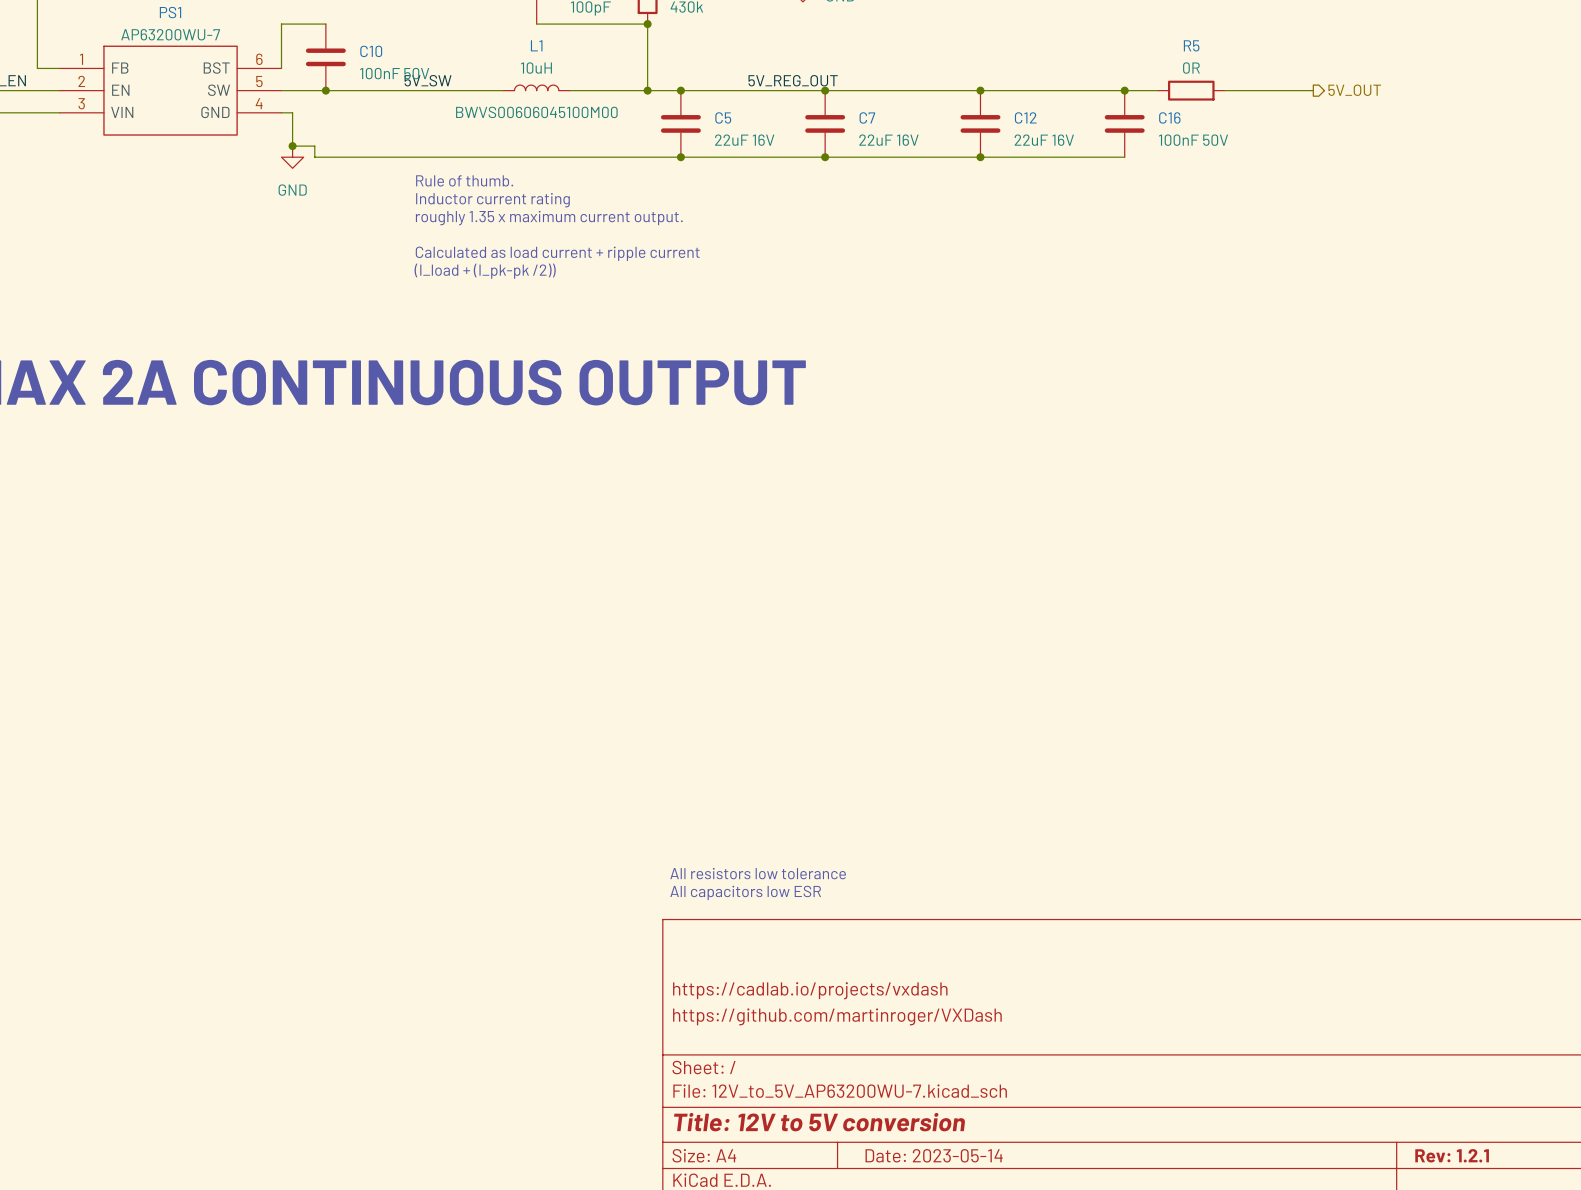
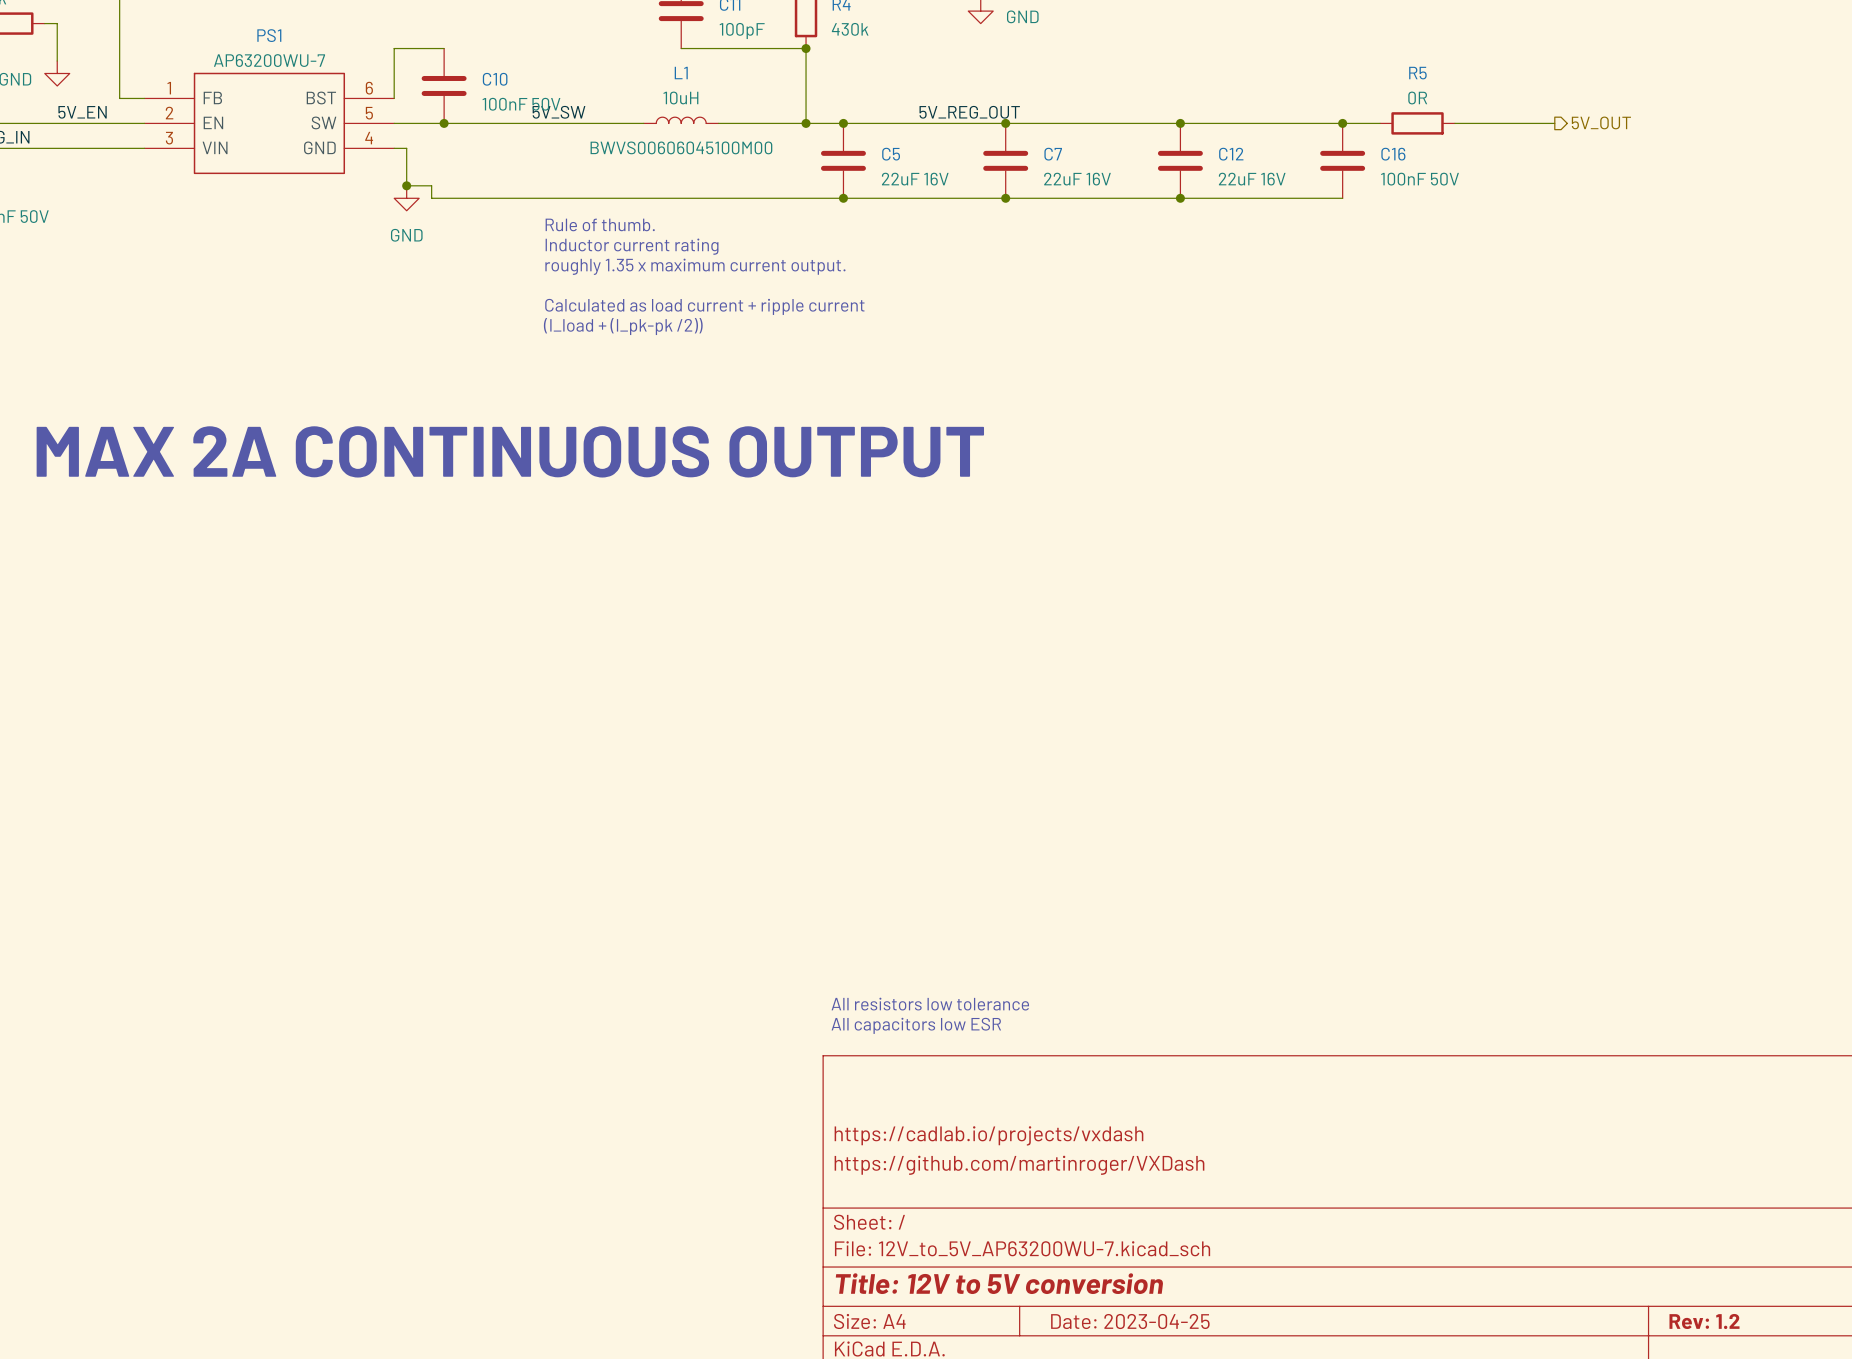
title block: Date: 2023-05-14 (934, 1155) -> Date: 2023-04-25 (1130, 1321)
title block: Rev: 1.2.1 (1452, 1155) -> Rev: 1.2 (1704, 1321)

